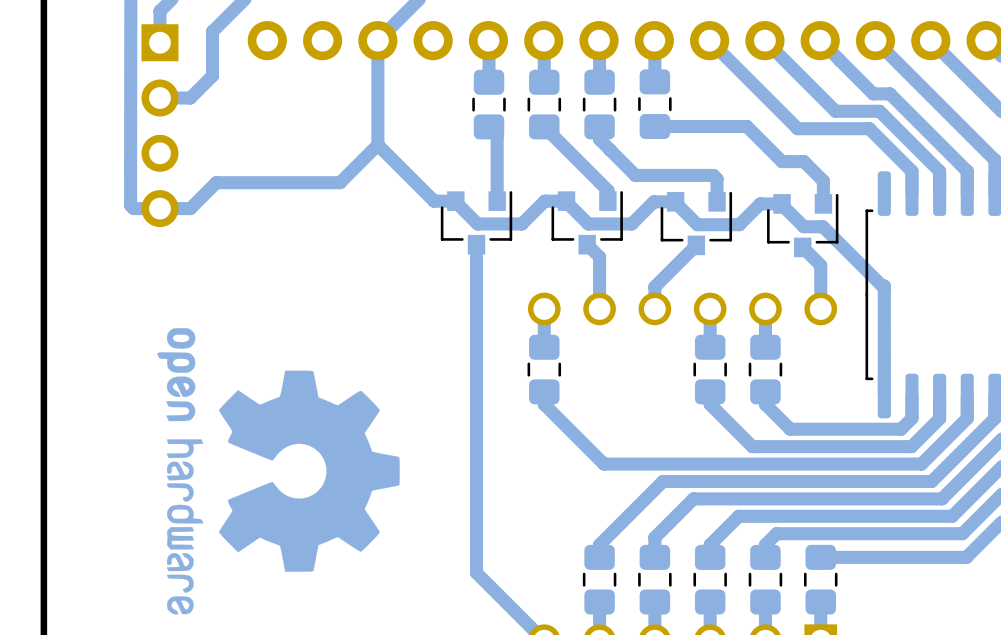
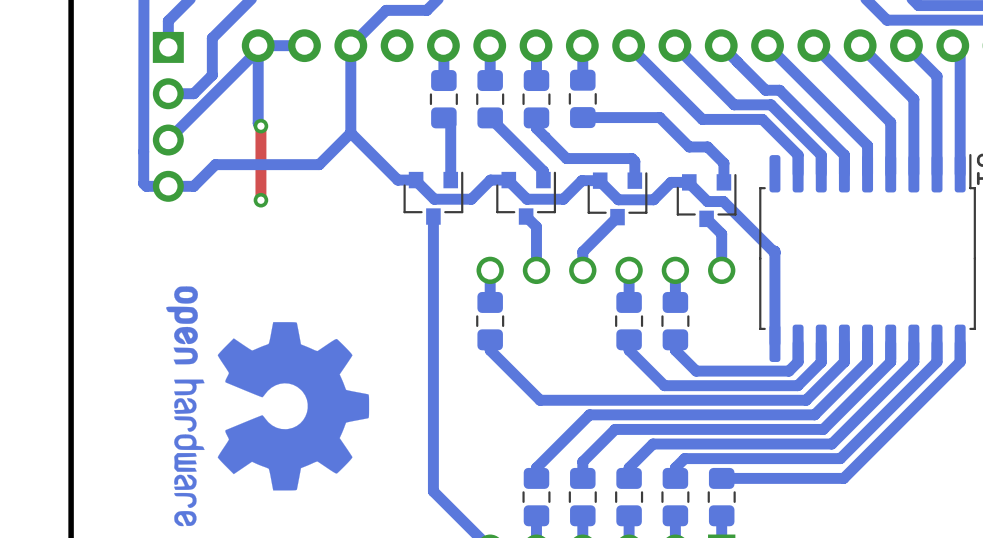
bottom track: none -> (258, 45) (258, 123) (260, 126)
bottom track: none -> (304, 45) (262, 45) (168, 140)
top track: none -> (260, 126) (260, 200)
via: none -> (260, 126)
via: none -> (260, 200)

